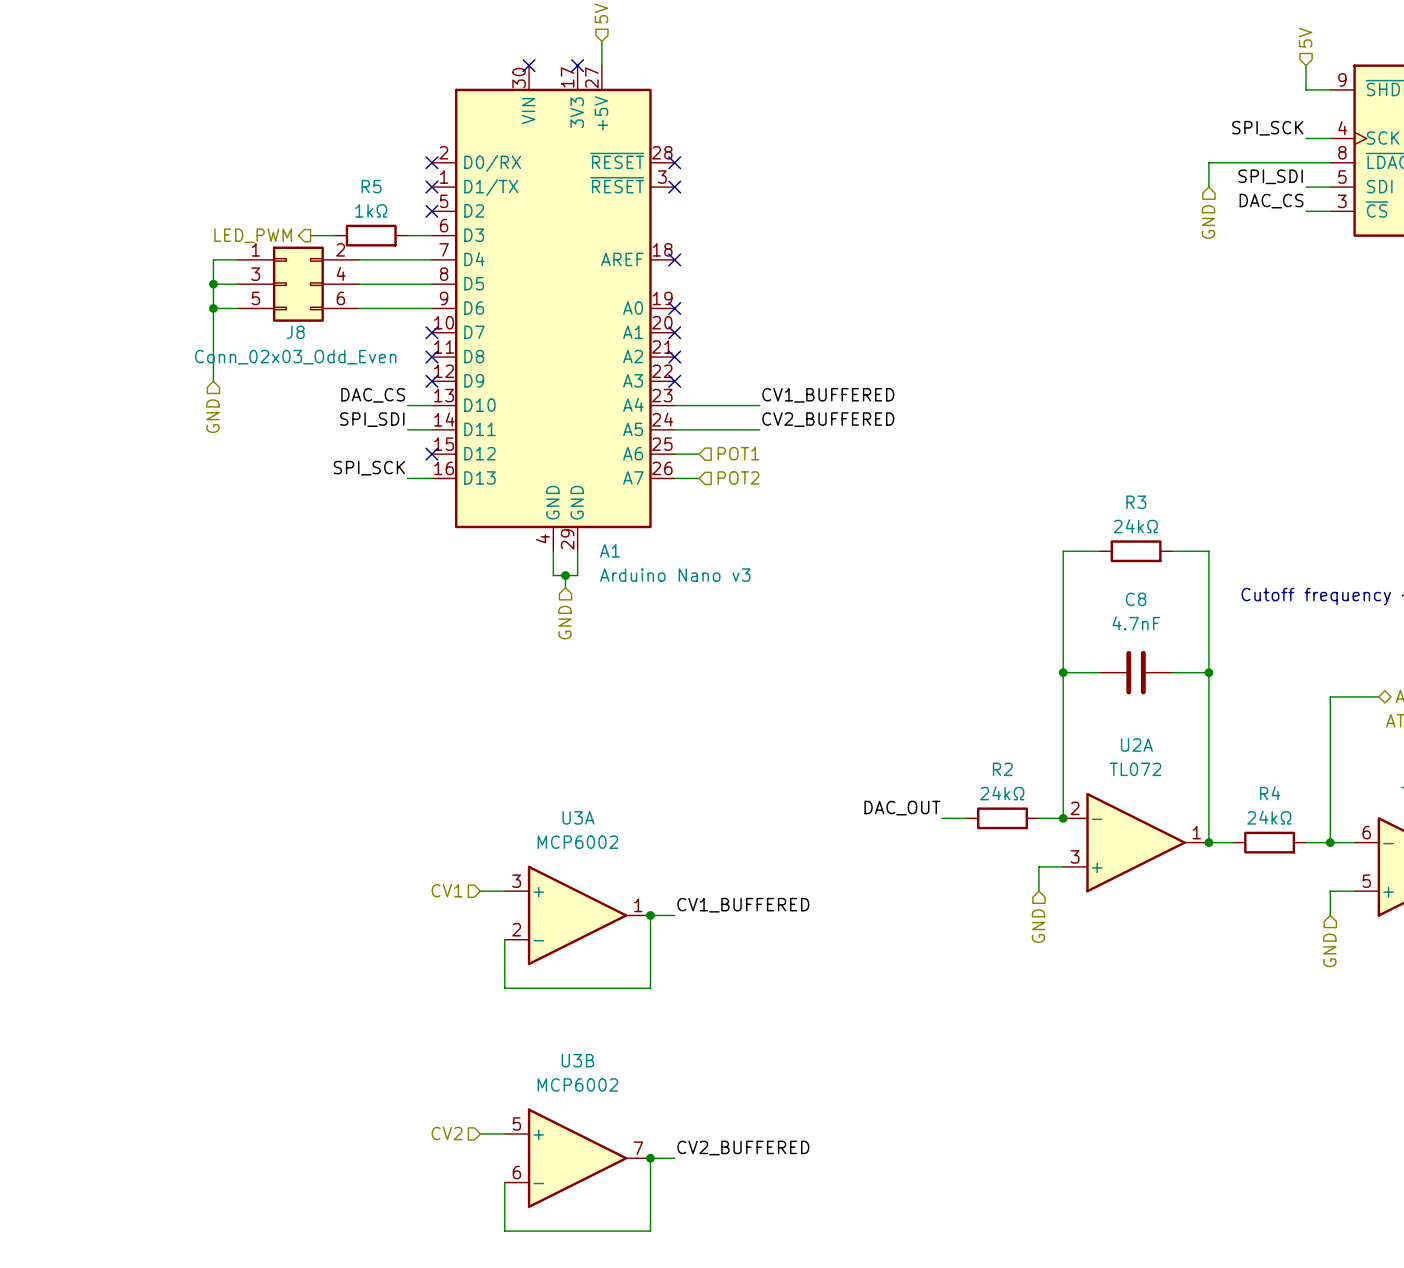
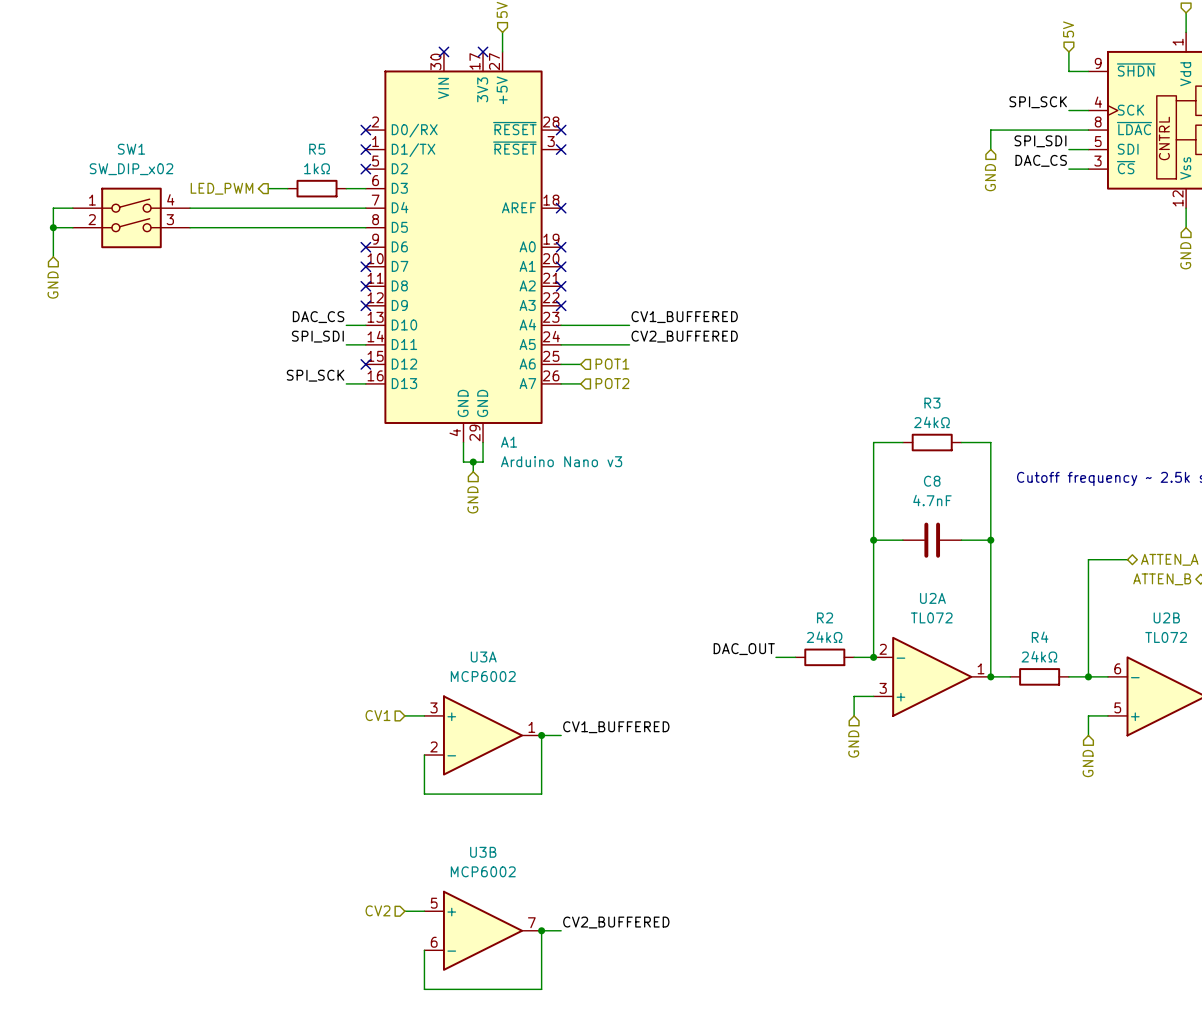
wire: none -> (72, 208) (53, 208) (53, 256)
wire: (213, 259) (213, 381) -> none
SW1: none -> SW_DIP_x02 (131, 217)
junction: none -> (53, 227)
junction: (213, 284) -> none
J8: Conn_02x03_Odd_Even (298, 284) -> none
wire: (213, 308) (237, 308) -> (53, 227) (72, 227)
junction: (213, 308) -> none
wire: (359, 308) (431, 308) -> none
no-connect mark: none -> (365, 247)
hierarchical label position: GND (212, 416) -> GND (53, 285)

